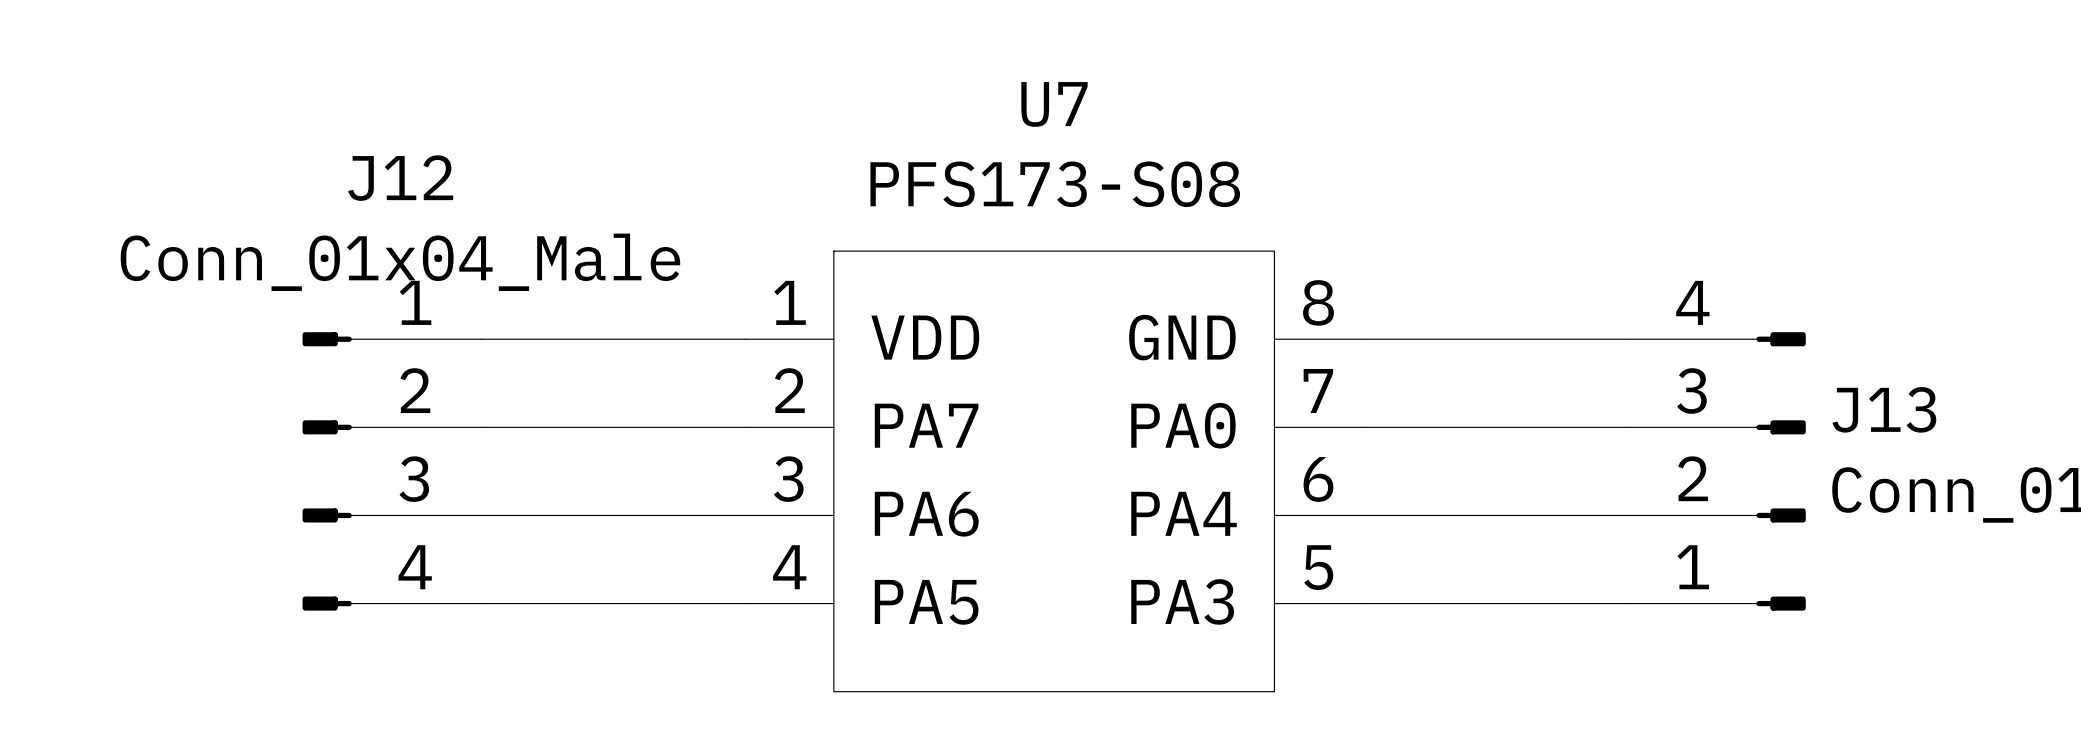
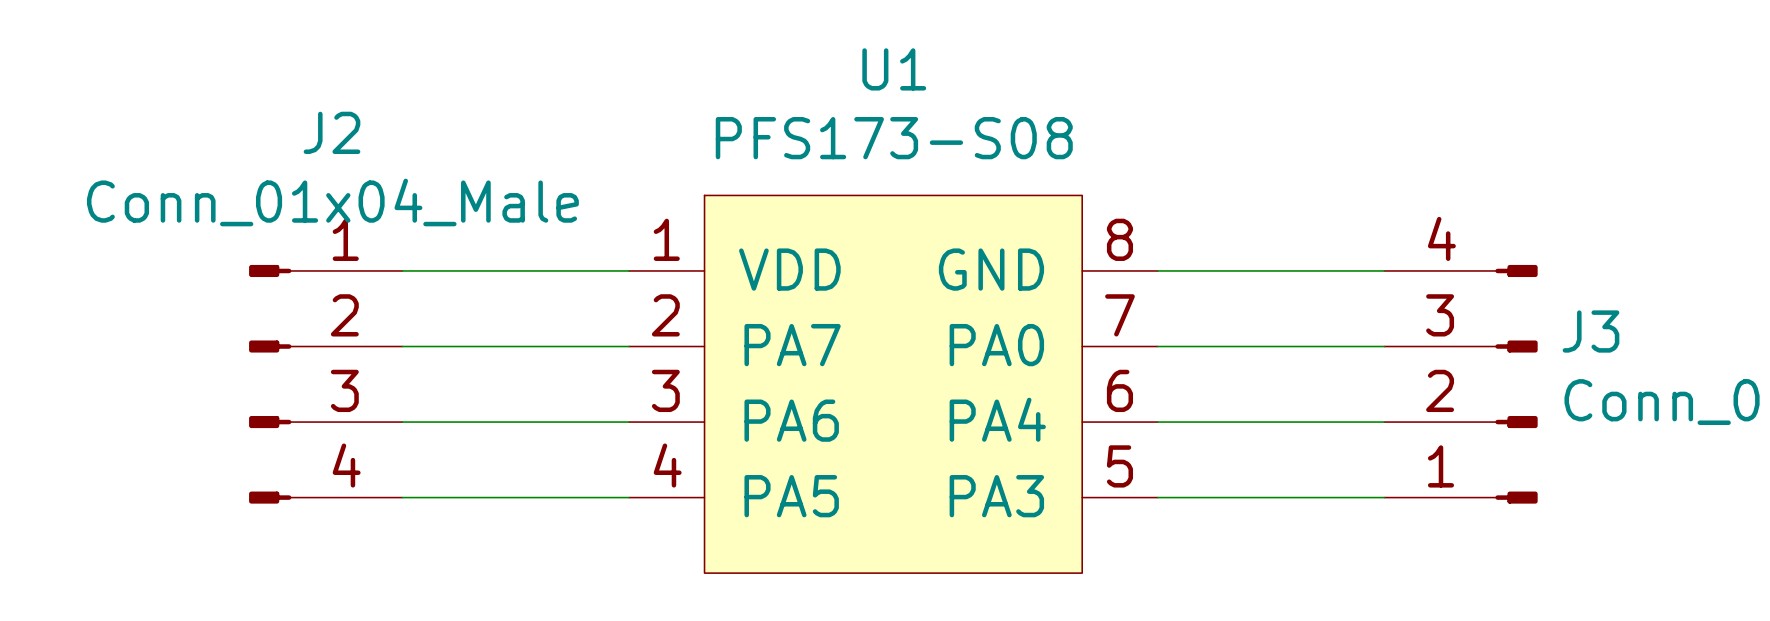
U7 name: U7 (1054, 104) -> U1 (894, 69)
J12 name: J12 (400, 178) -> J2 (332, 132)
J13 name: J13 (1884, 409) -> J3 (1591, 331)

